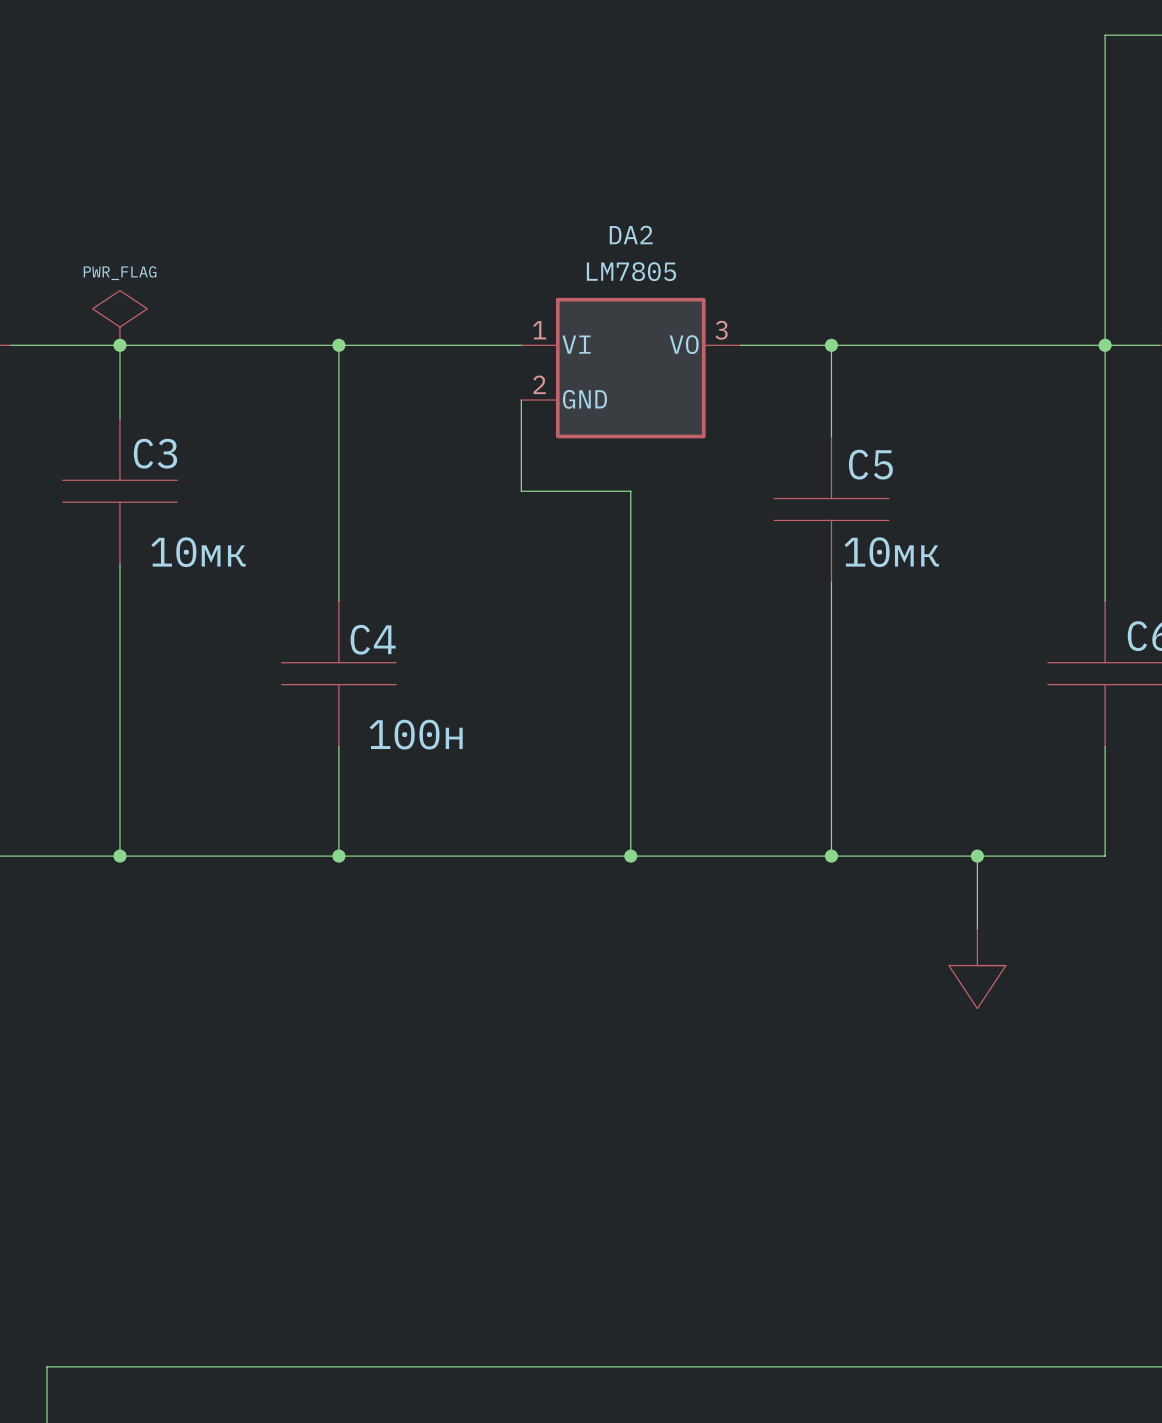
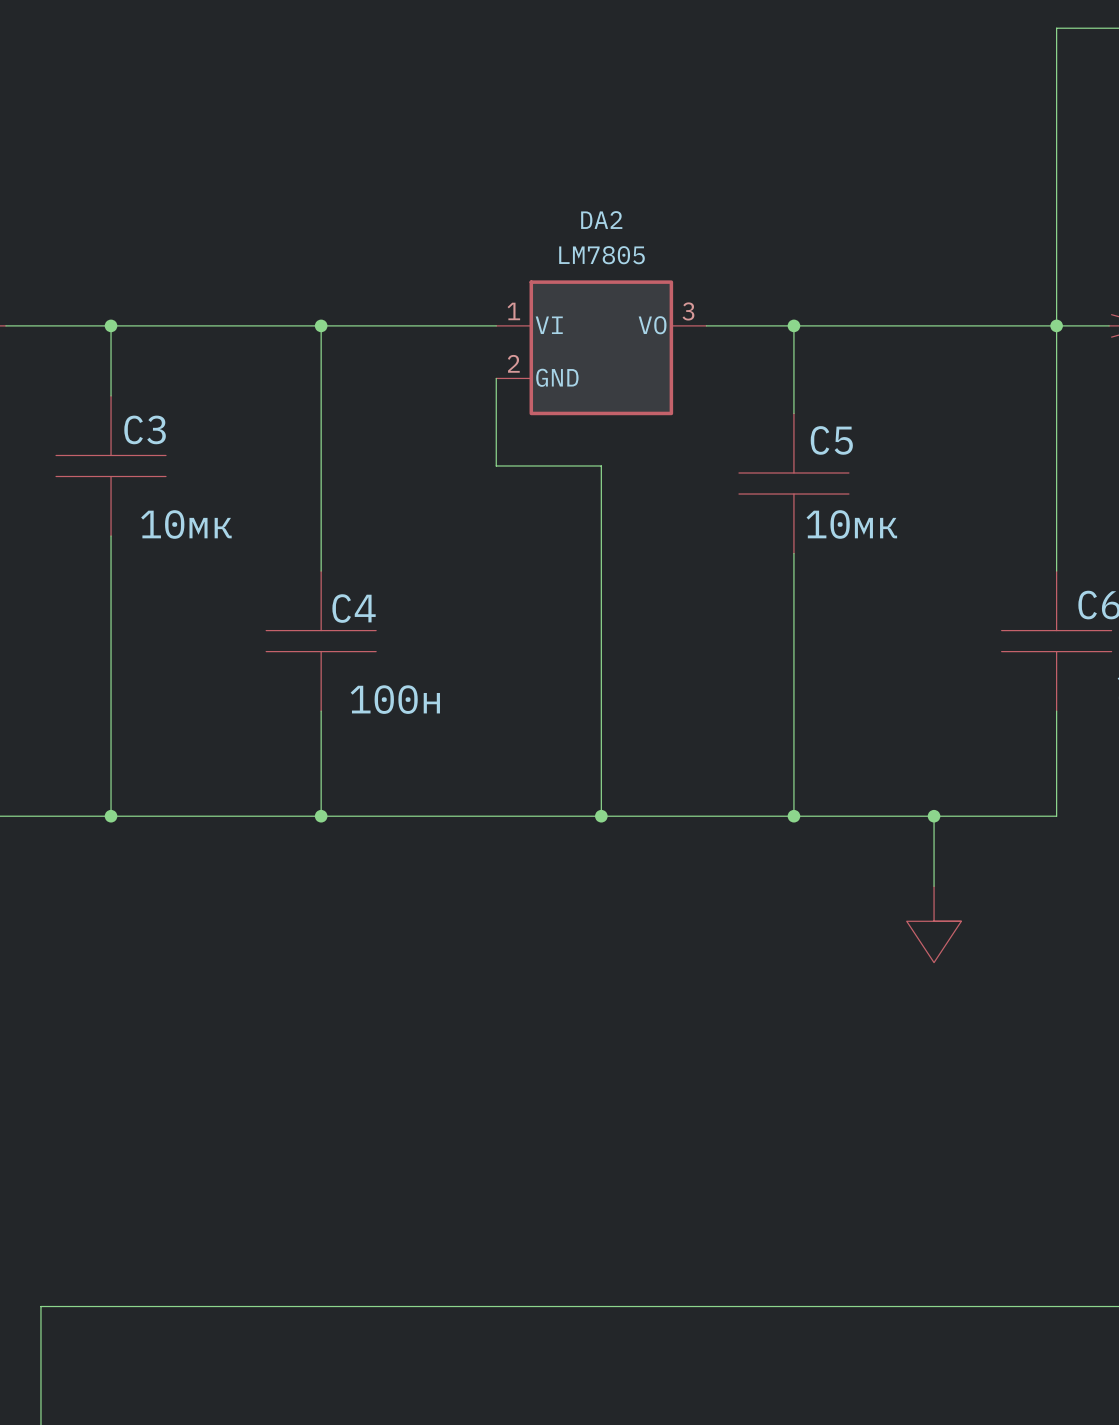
power symbol: PWR_FLAG (119, 317) -> none

